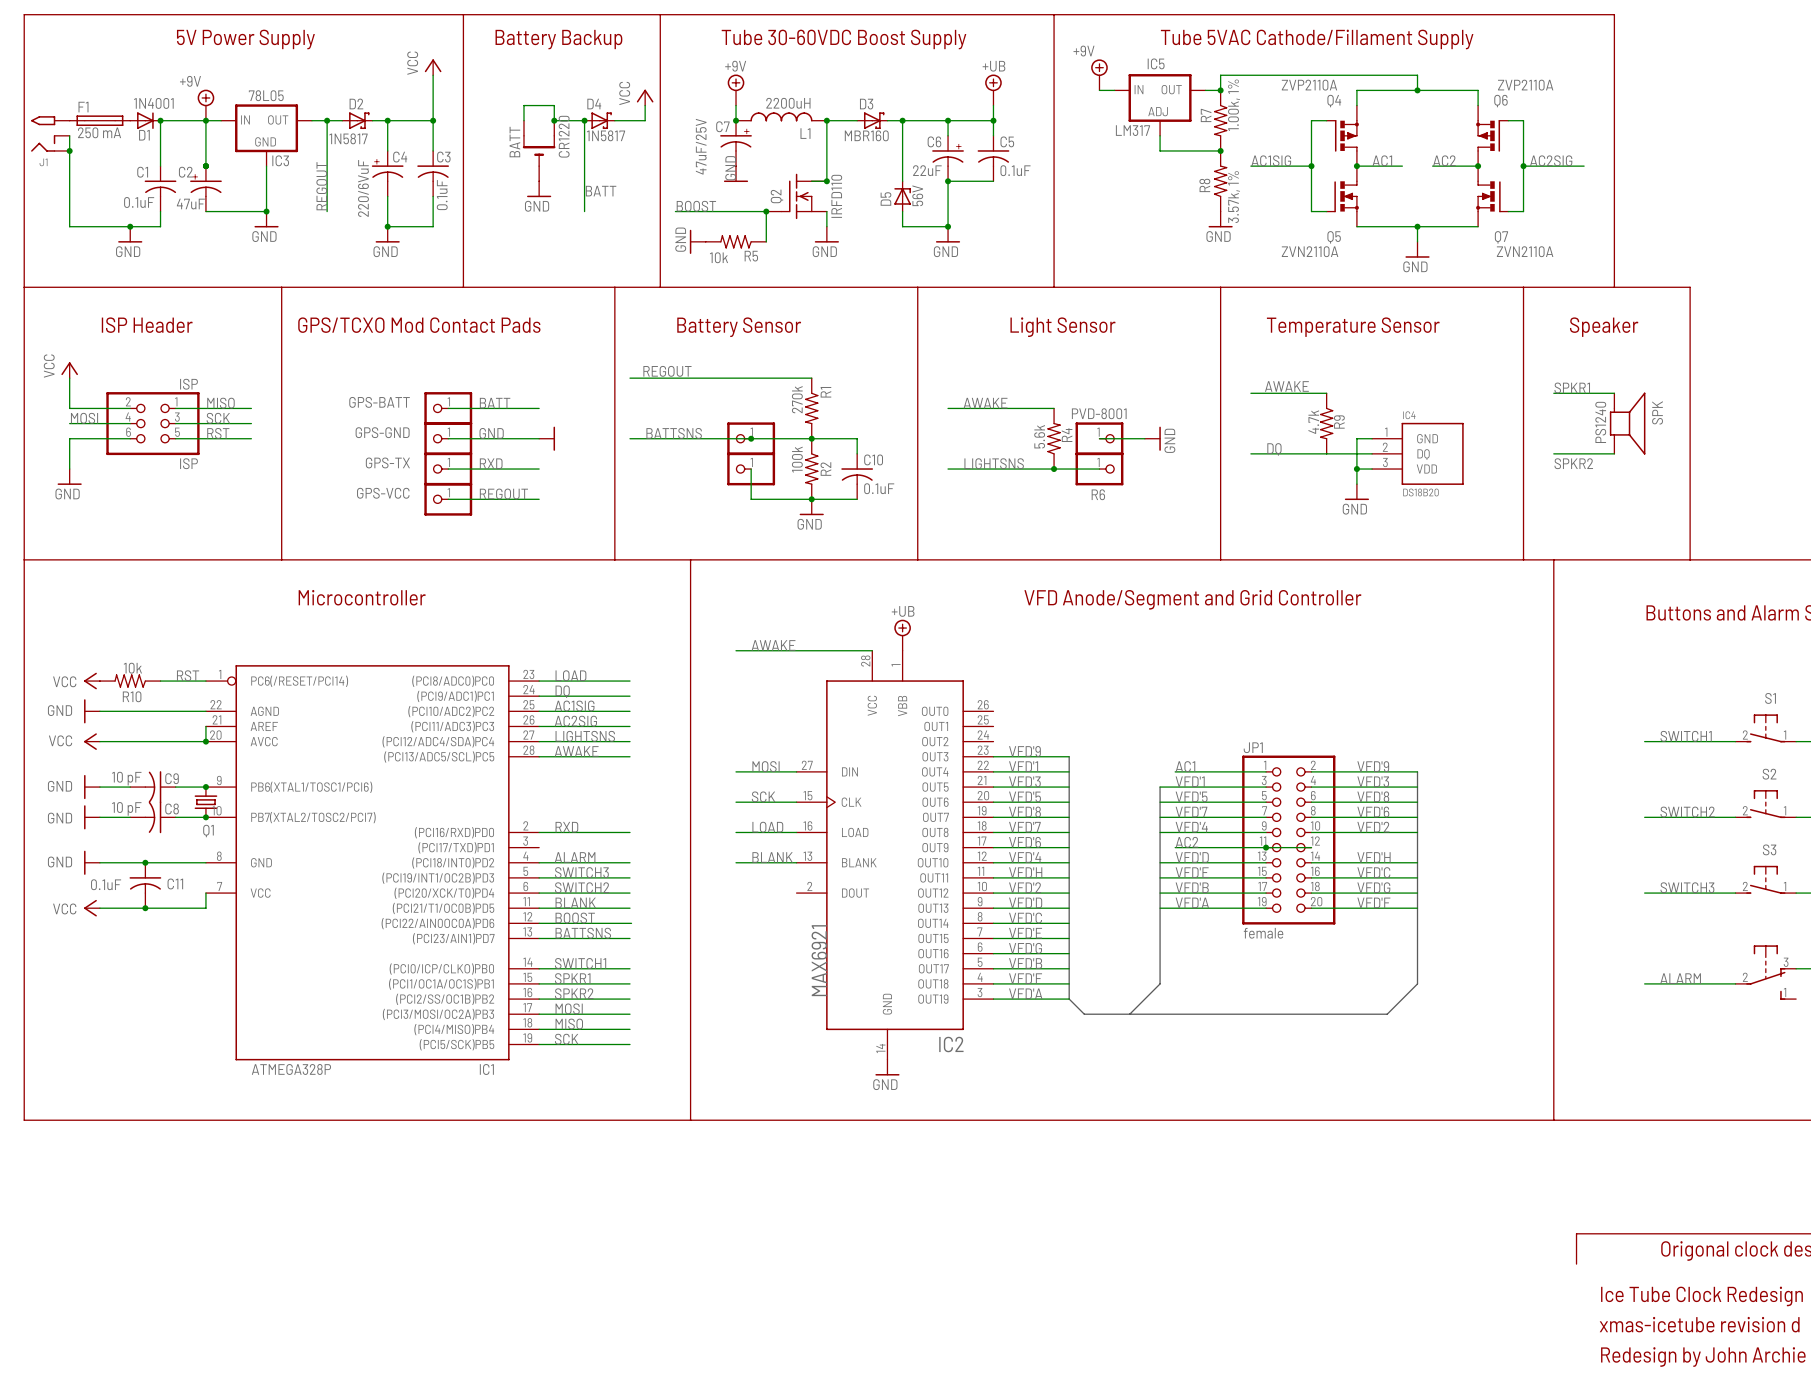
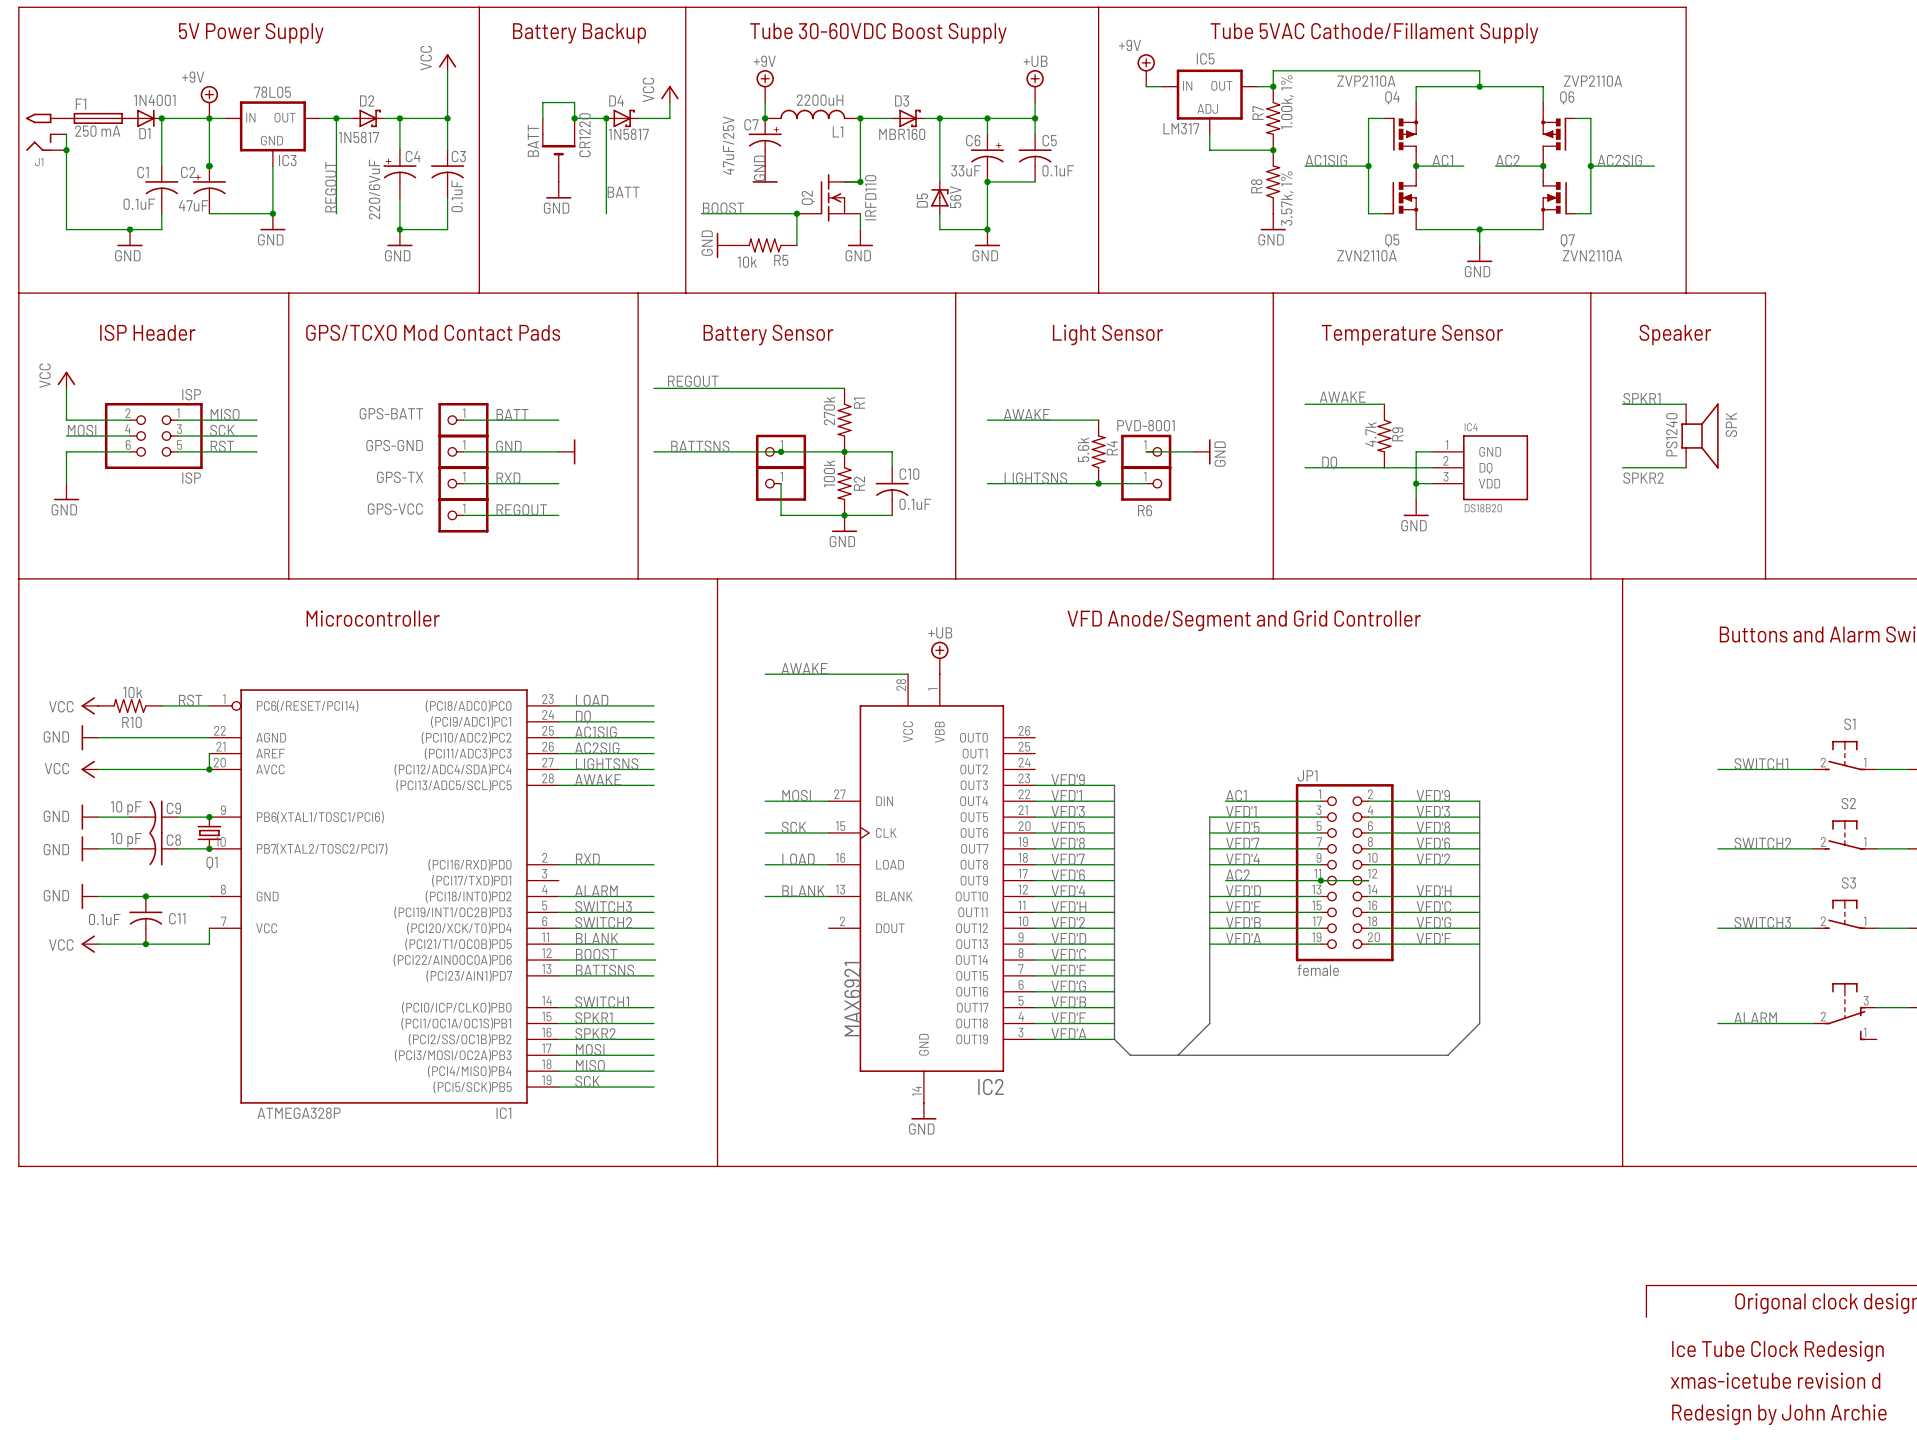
C6 value: 22uF (927, 170) -> 33uF (966, 170)

